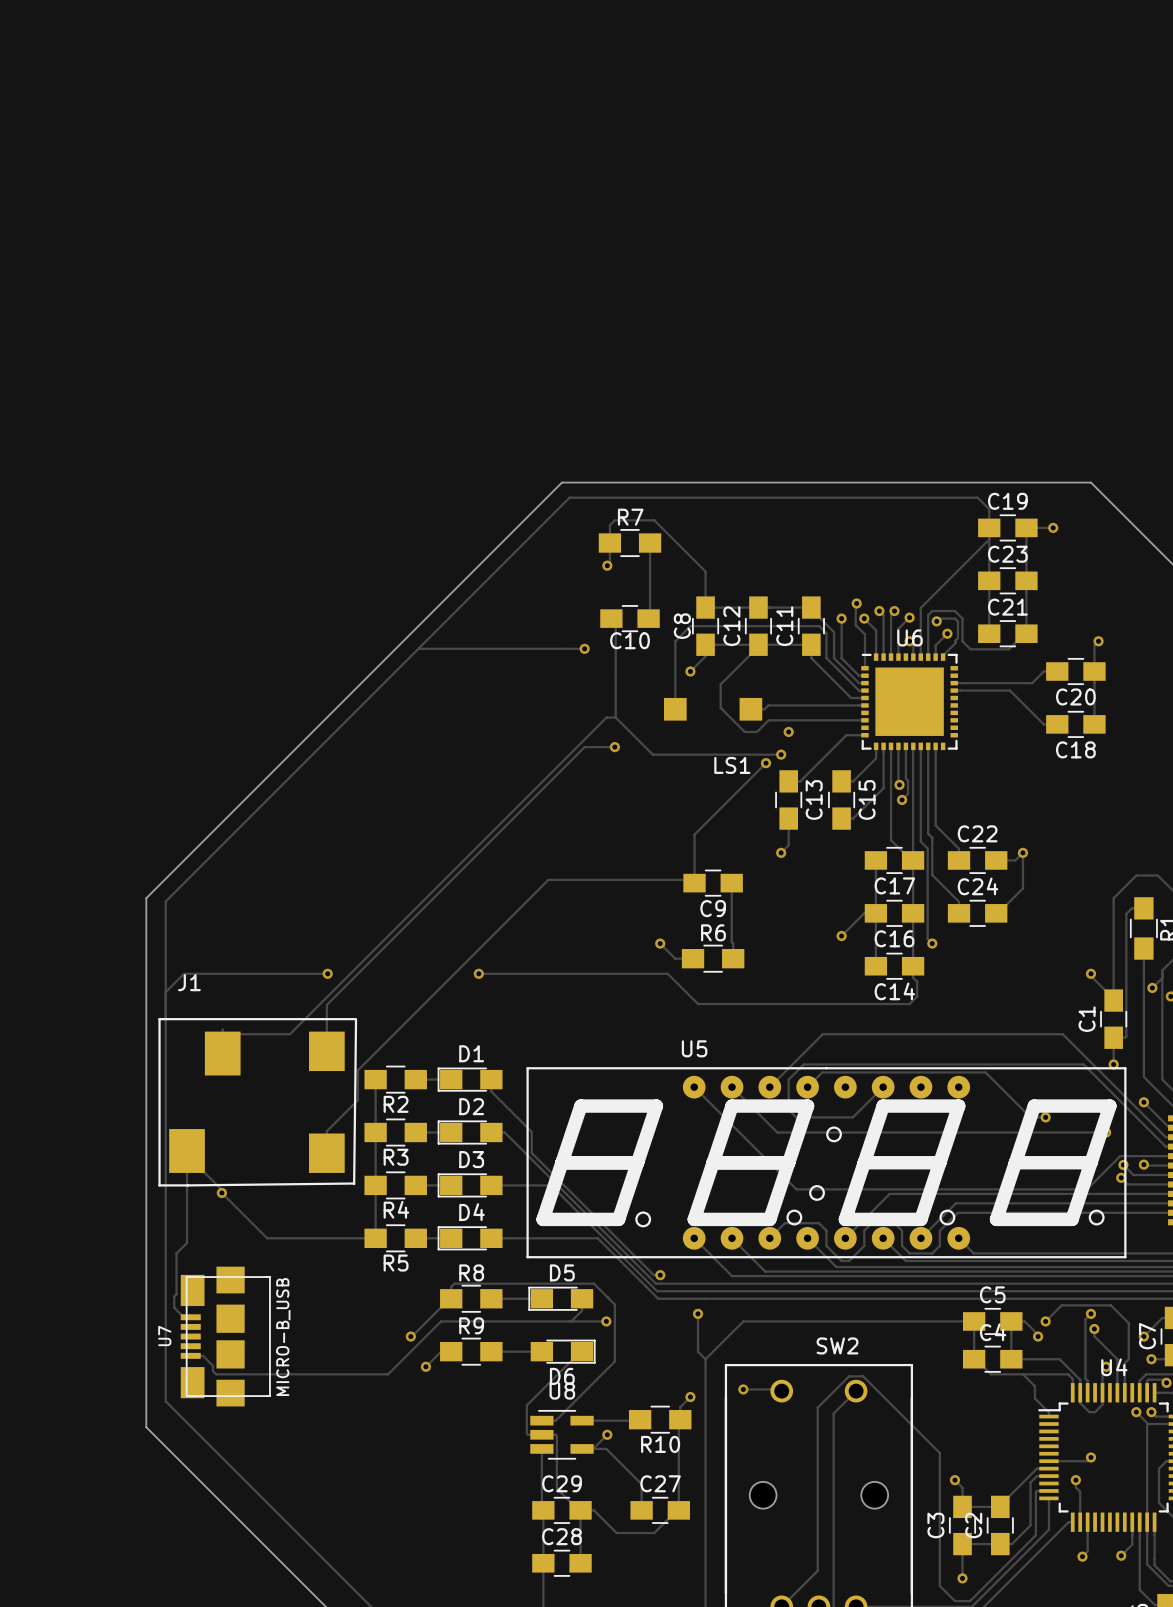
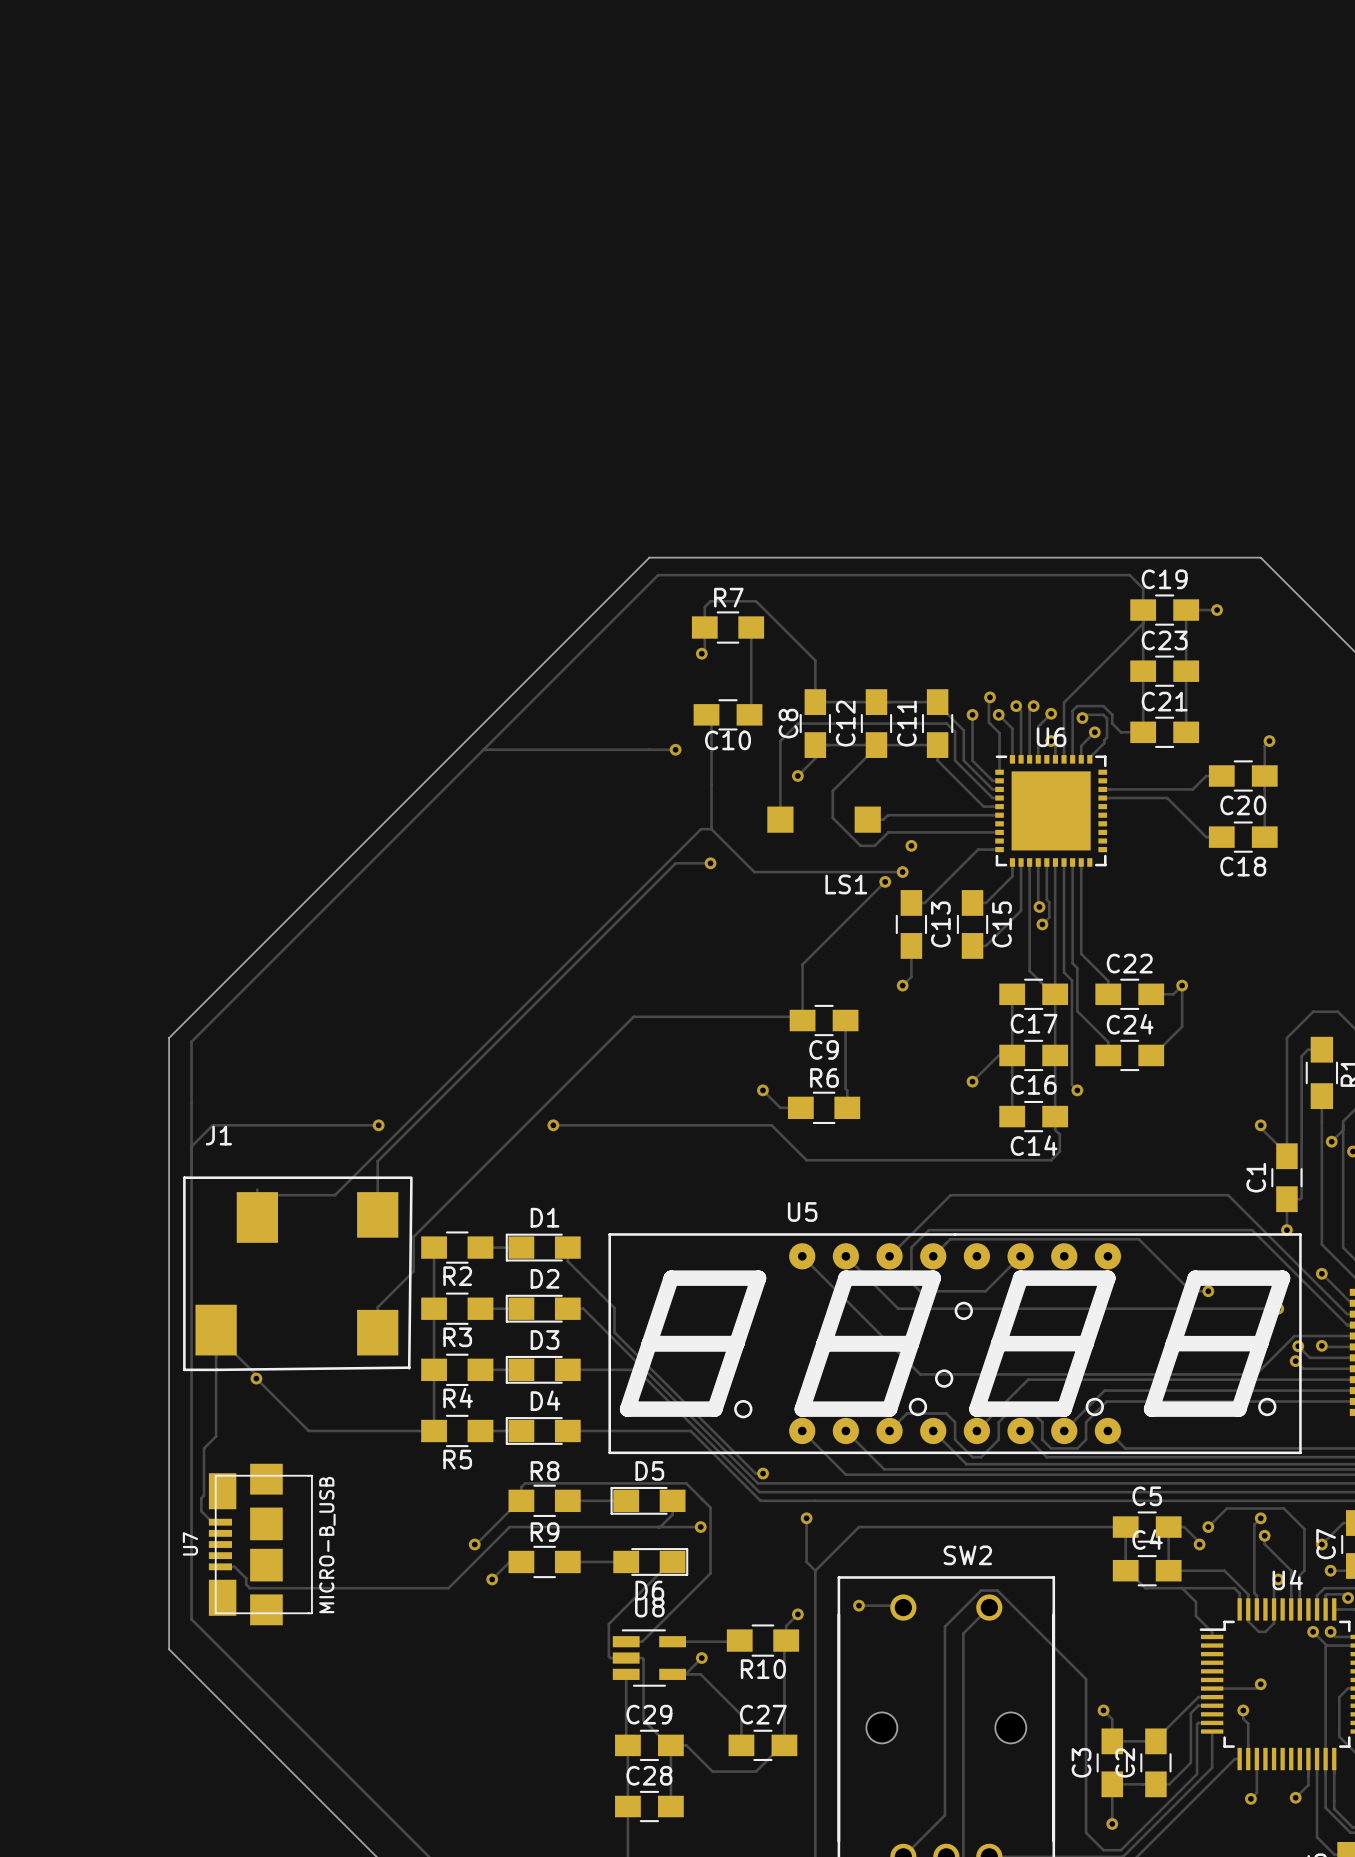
track: (962, 626) (962, 641) (970, 649) (1009, 649) (1024, 633) -> (1112, 723) (1121, 732) (1143, 732)

